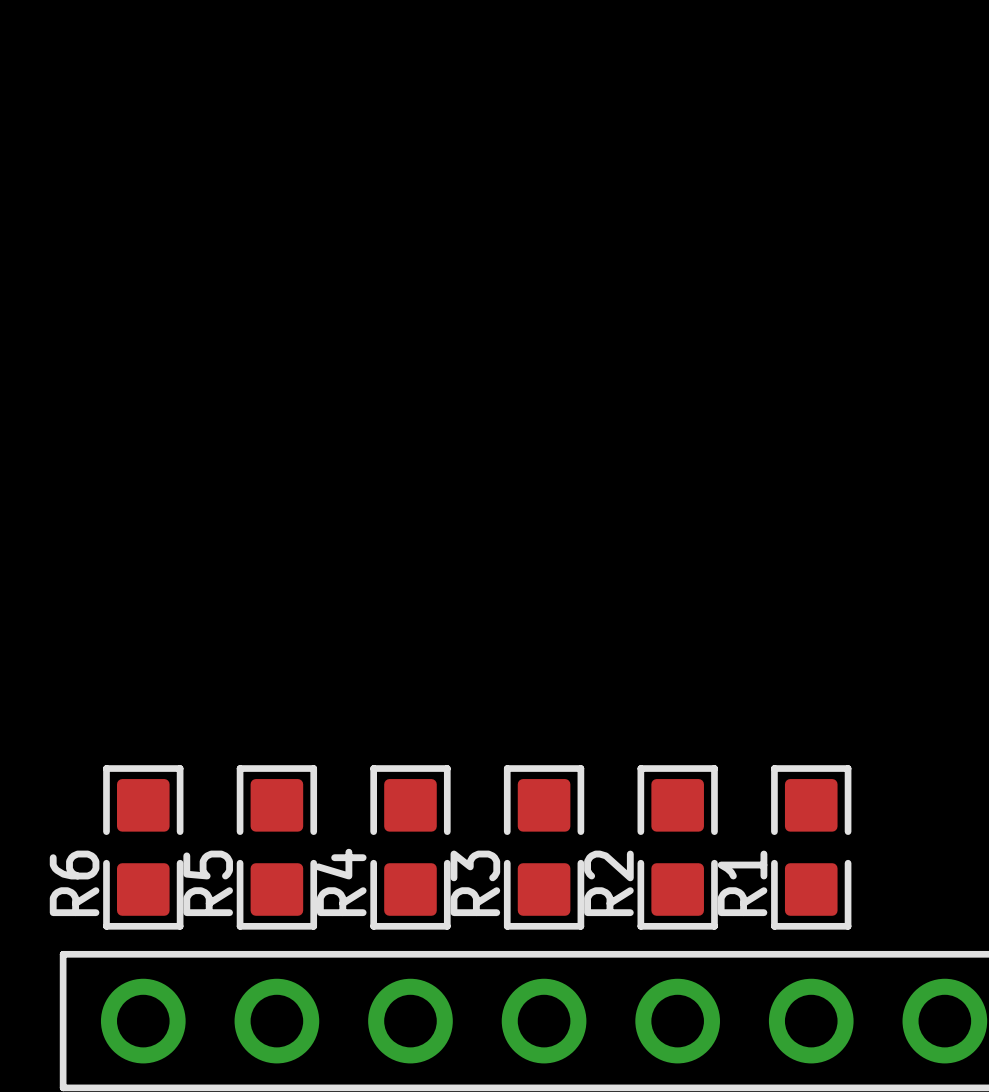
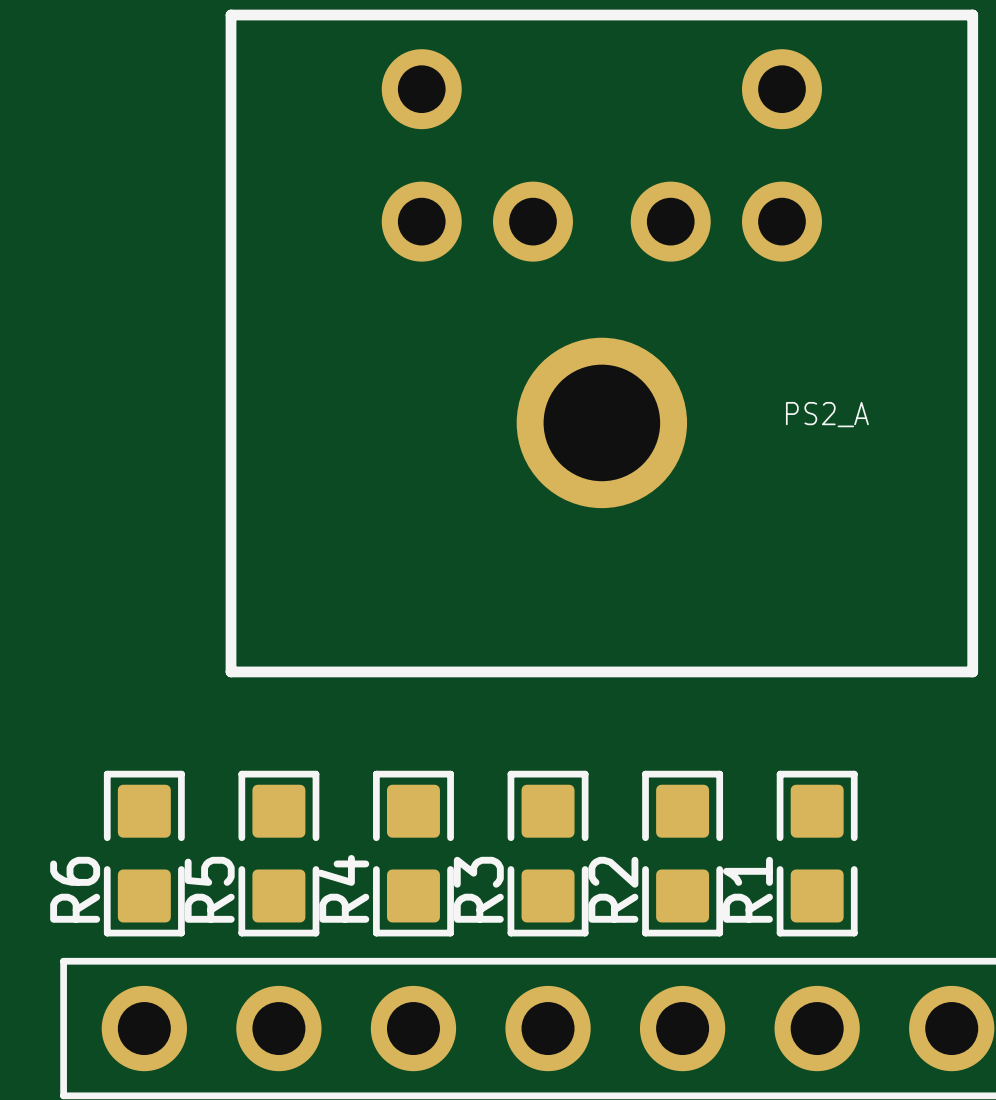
PS2_A: none -> (601, 343)

